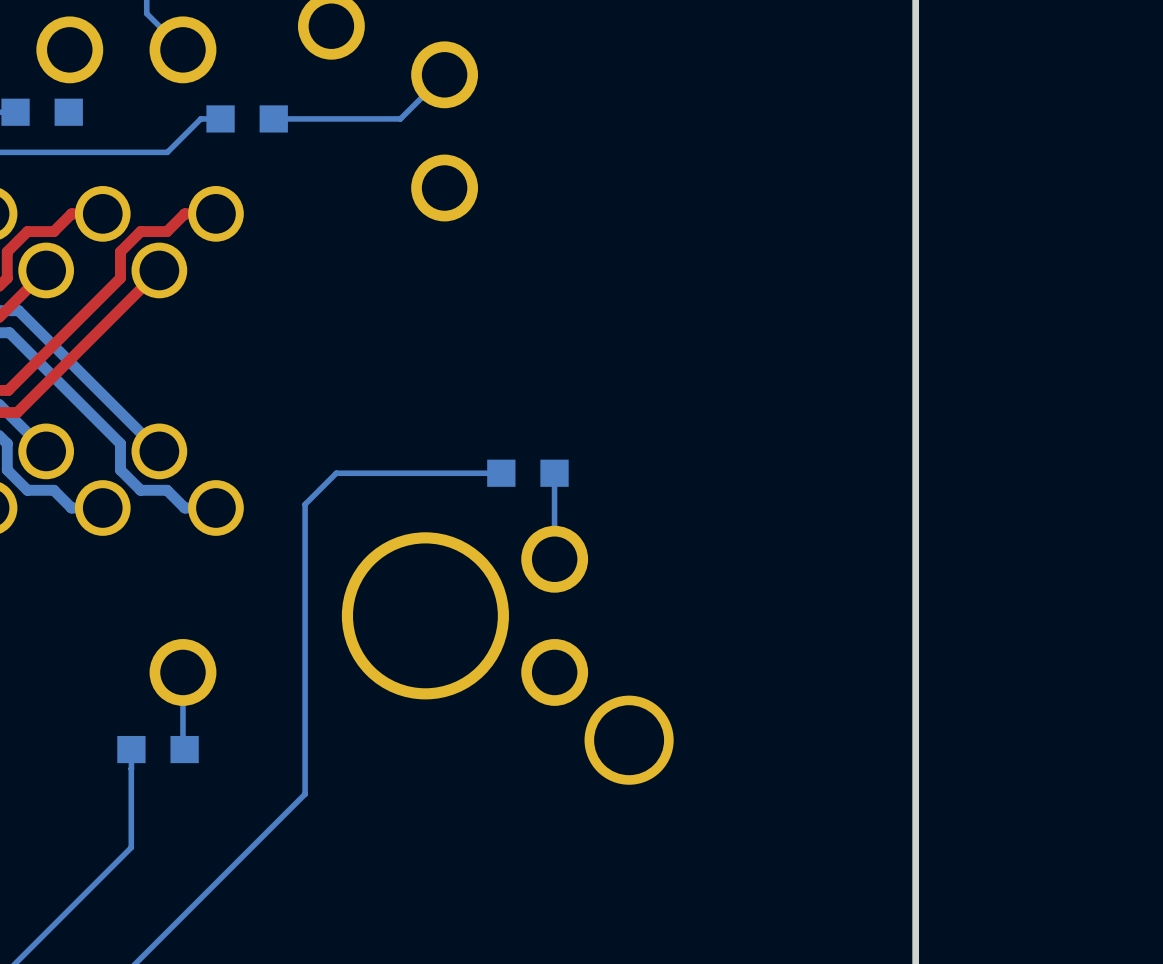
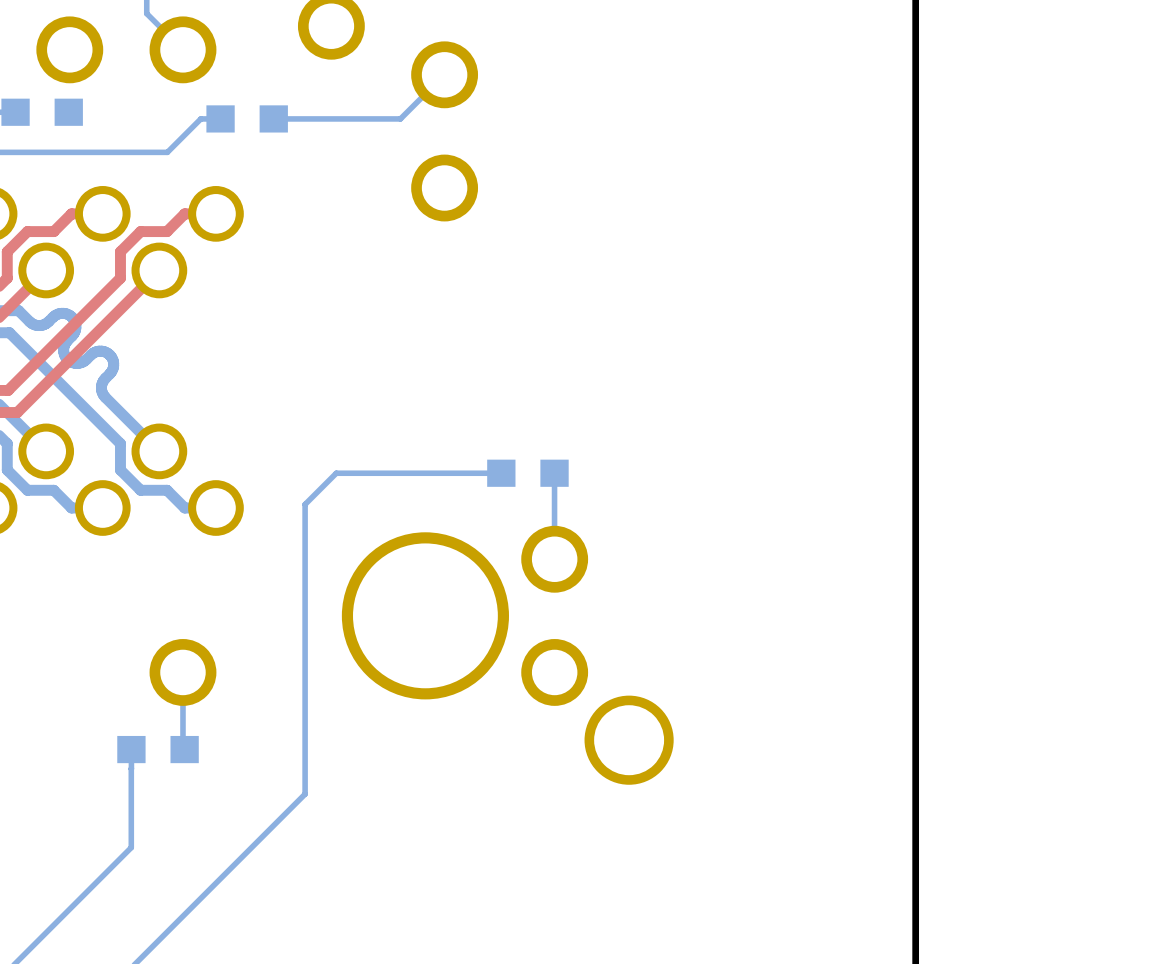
bottom track: (29, 321) (105, 397) -> (29, 321) (40, 325) (58, 314) (64, 313) (72, 317) (75, 328) (64, 345) (64, 354) (67, 359) (75, 363) (84, 361) (95, 351) (101, 351) (109, 354) (113, 362) (113, 368) (101, 386) (105, 397)

